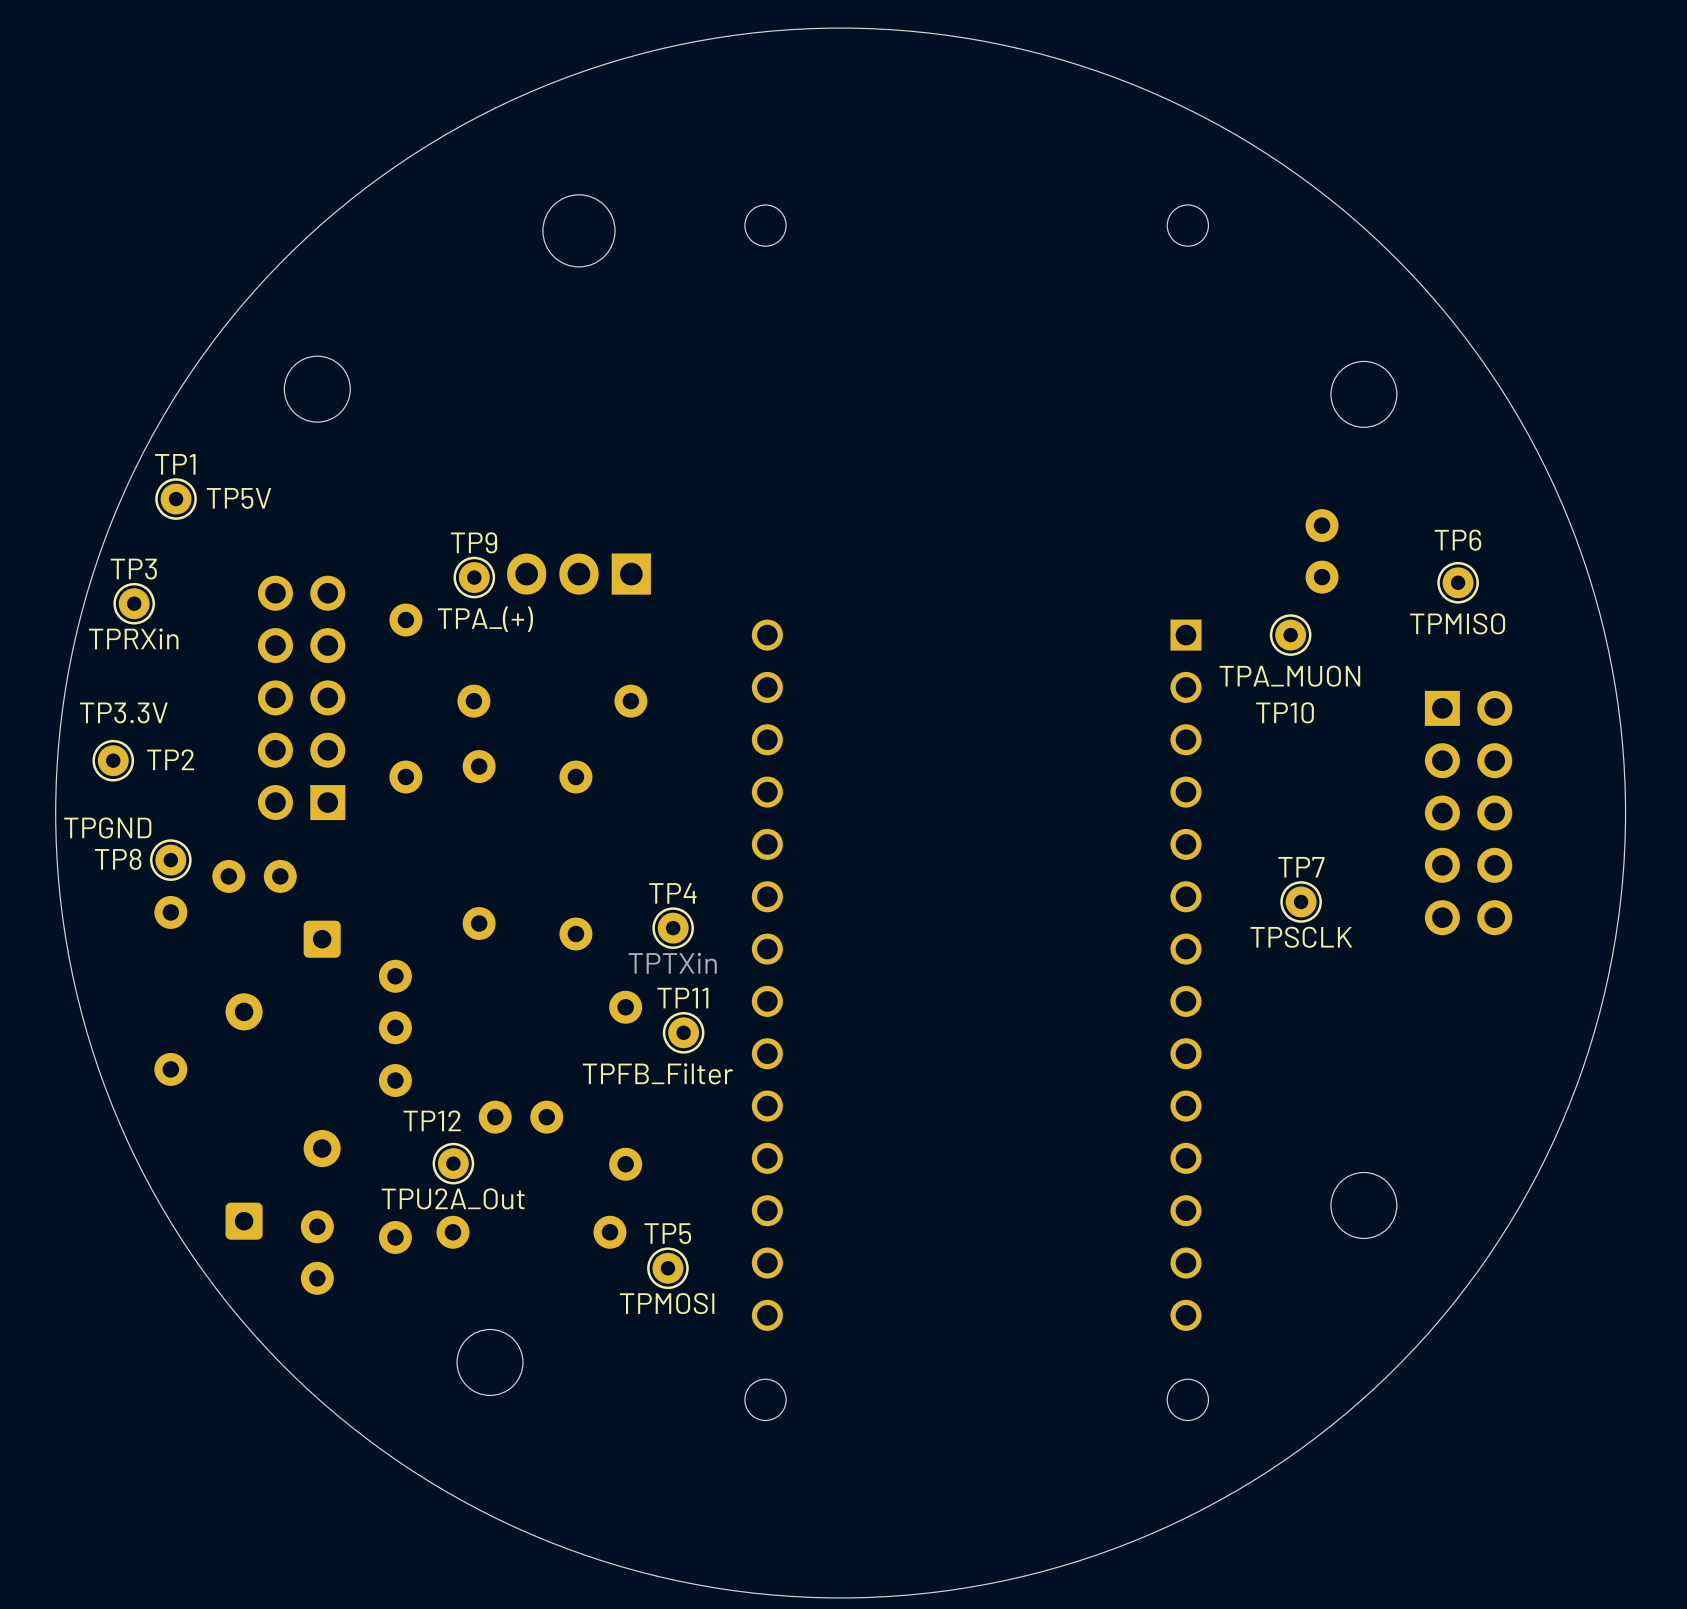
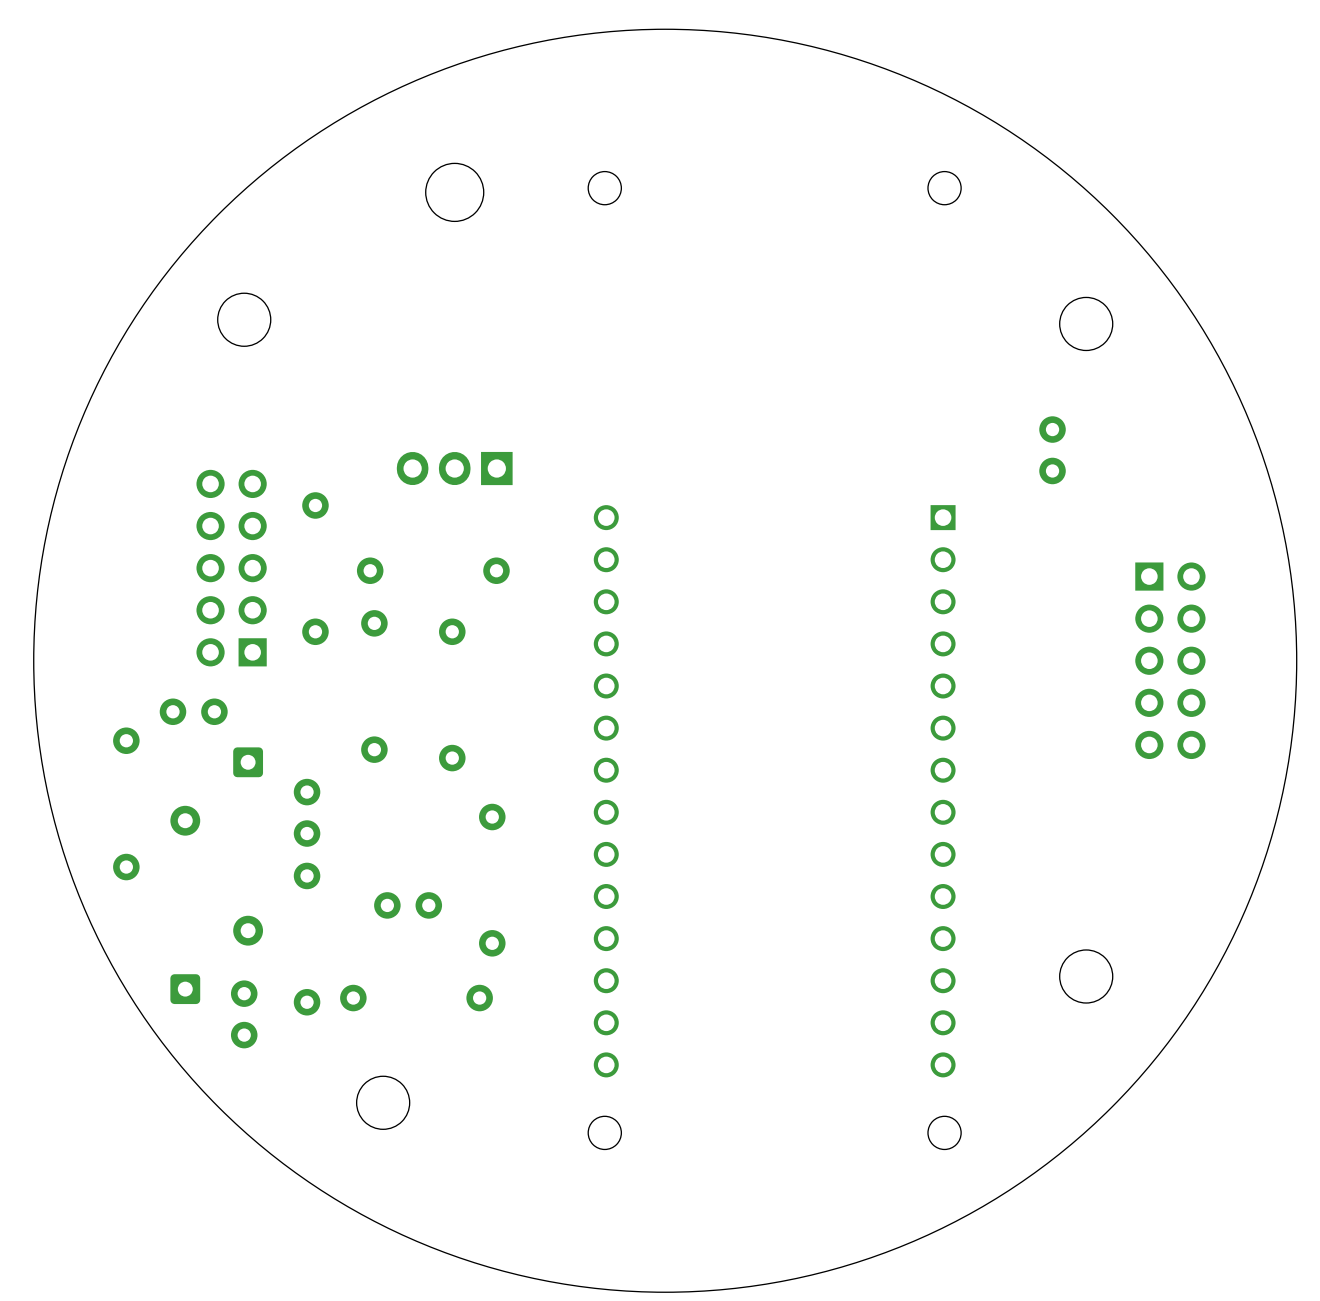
TP1: TP5V (176, 499) -> none
TP9: TPA_(+) (474, 577) -> none
TP6: TPMISO (1458, 582) -> none
TP3: TPRXin (134, 603) -> none
TP10: TPA_MUON (1290, 635) -> none
TP2: TP3.3V (113, 760) -> none
TP8: TPGND (170, 860) -> none
TP7: TPSCLK (1301, 901) -> none
TP4: TPTXin (673, 928) -> none
TP11: TPFB_Filter (683, 1032) -> none
TP12: TPU2A_Out (453, 1163) -> none
TP5: TPMOSI (667, 1268) -> none

